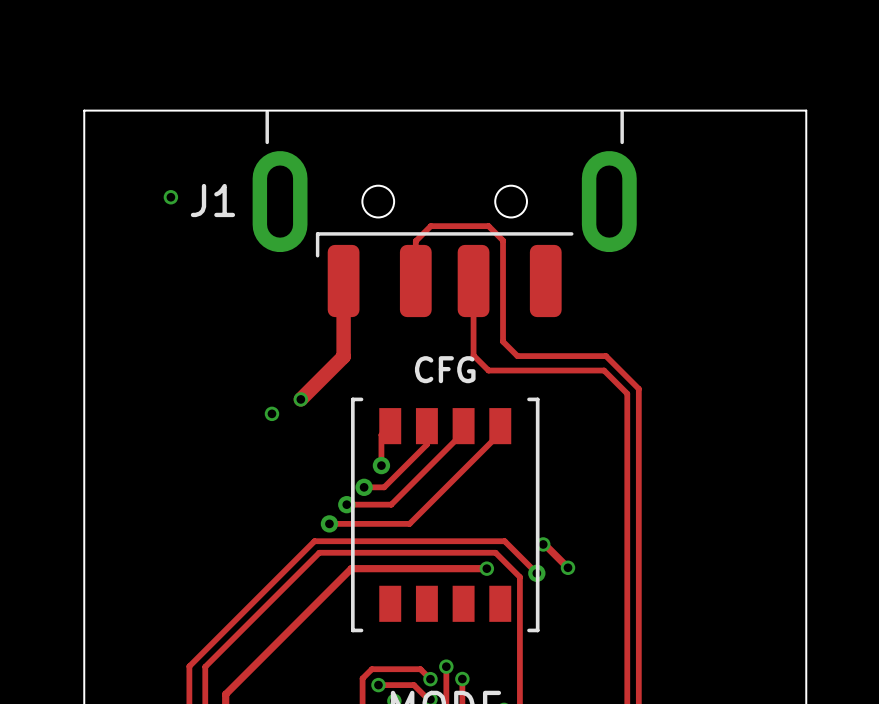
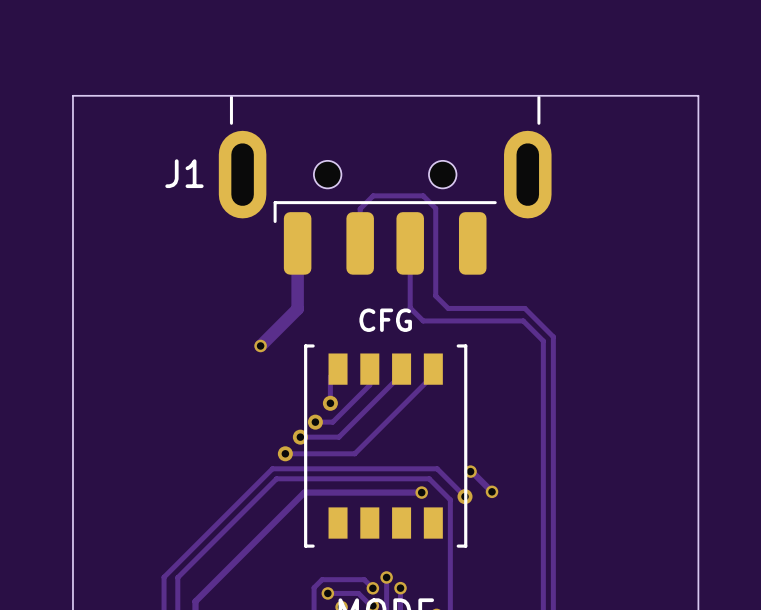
via: (170, 197) -> none
via: (271, 413) -> none

